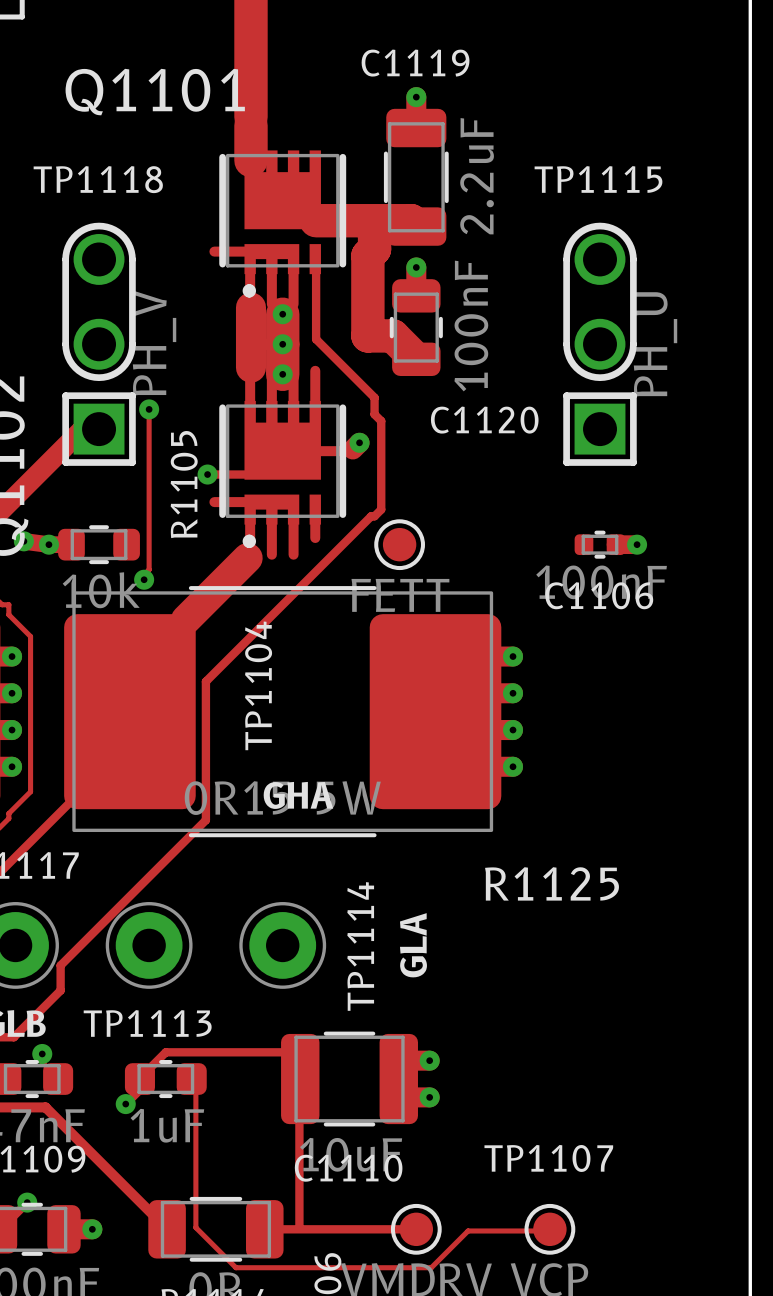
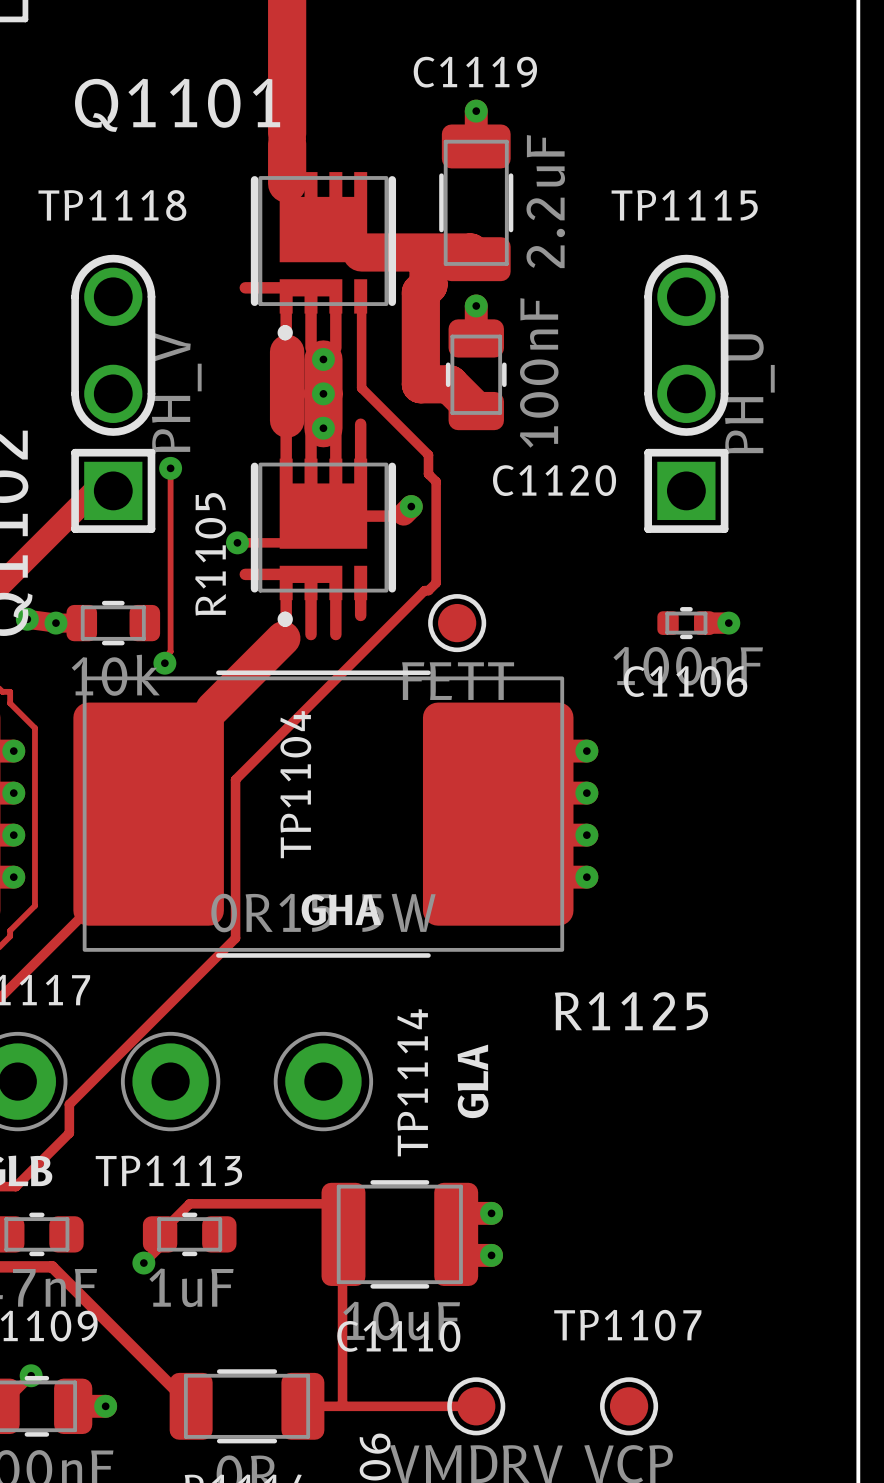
via: (42, 1053) -> none
track: (192, 1079) (195, 1082) (195, 1227) (235, 1267) (431, 1267) (468, 1230) (548, 1230) -> none

